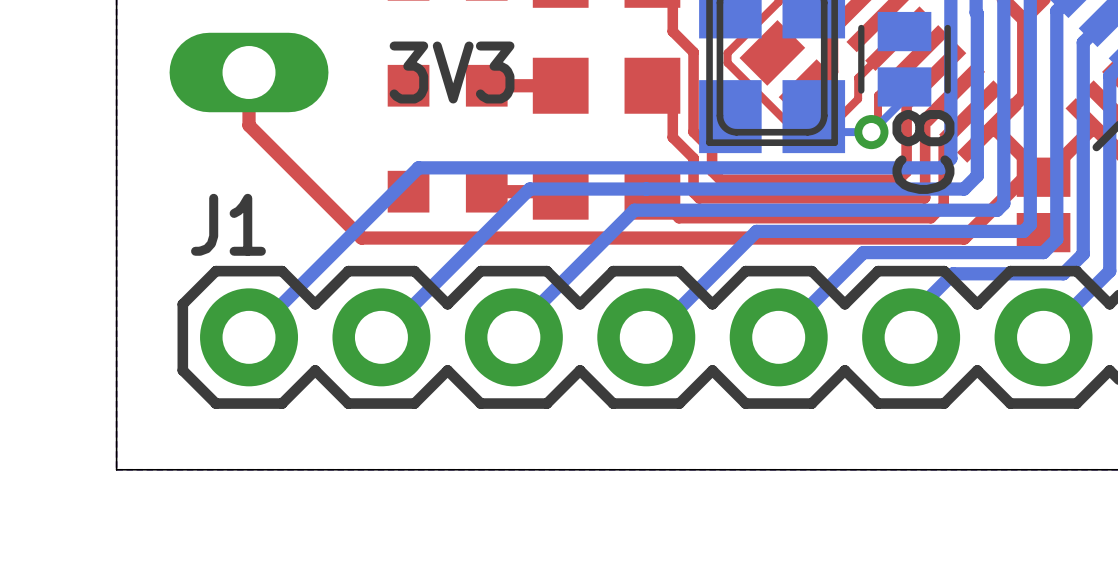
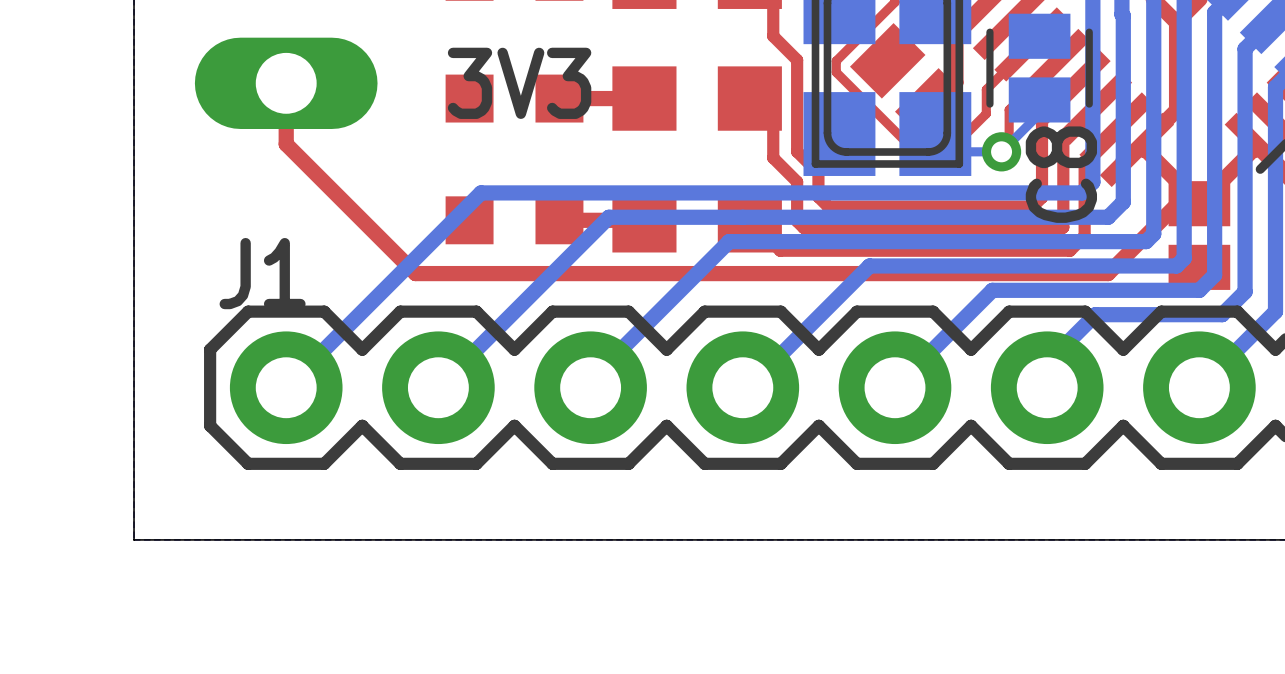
J1 name position: J1 (228, 224) -> J1 (262, 273)

